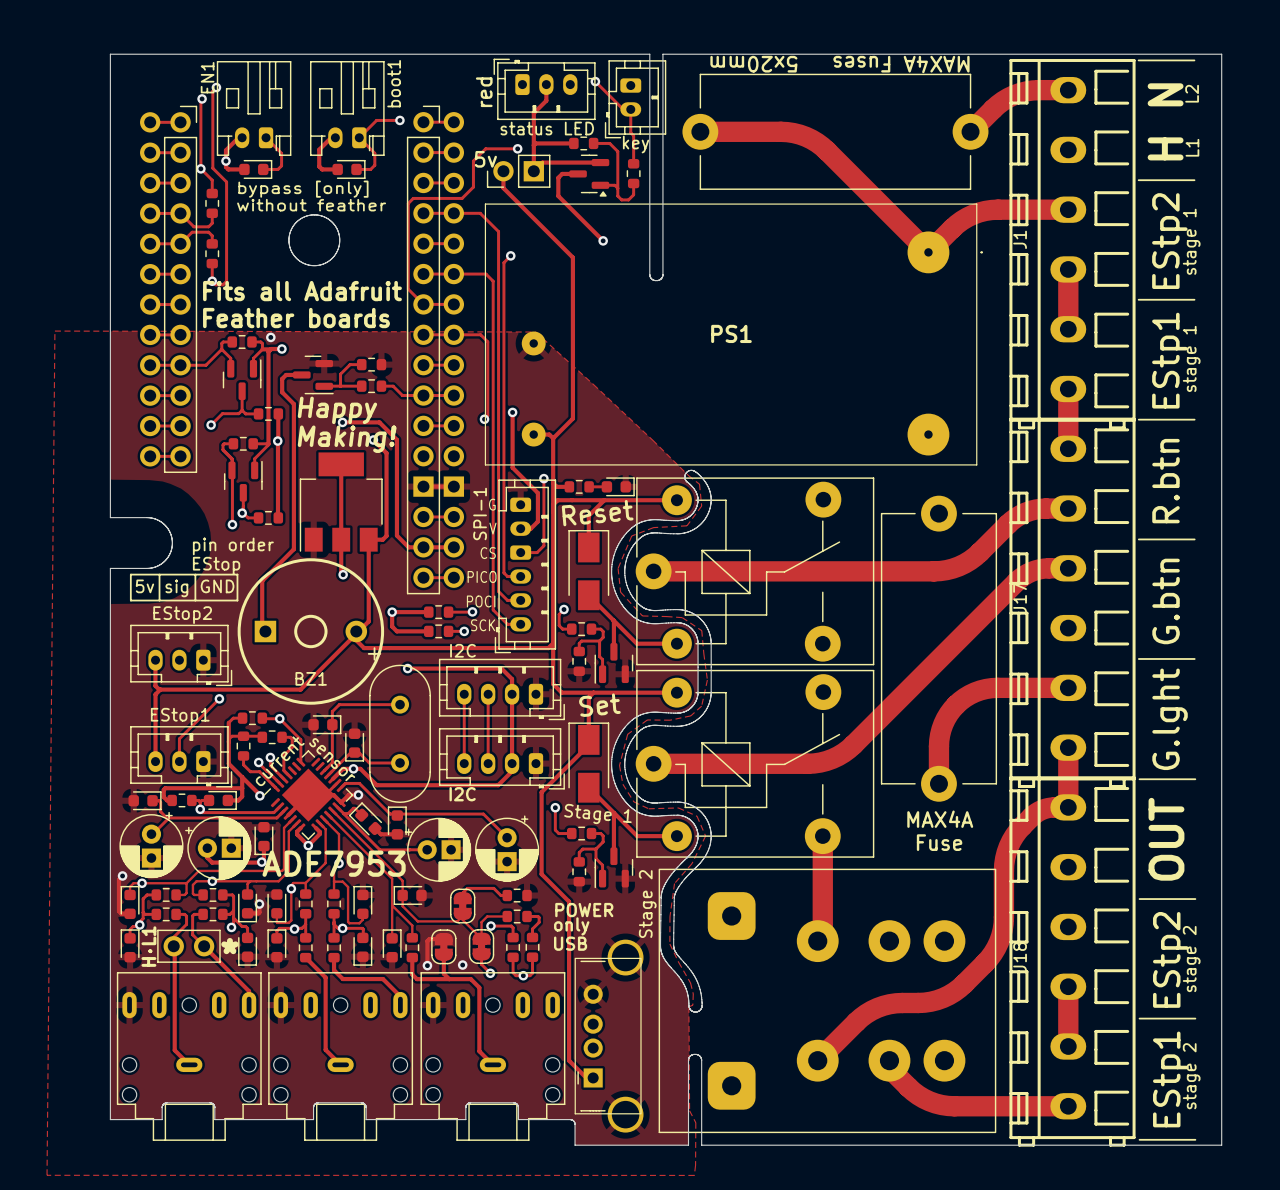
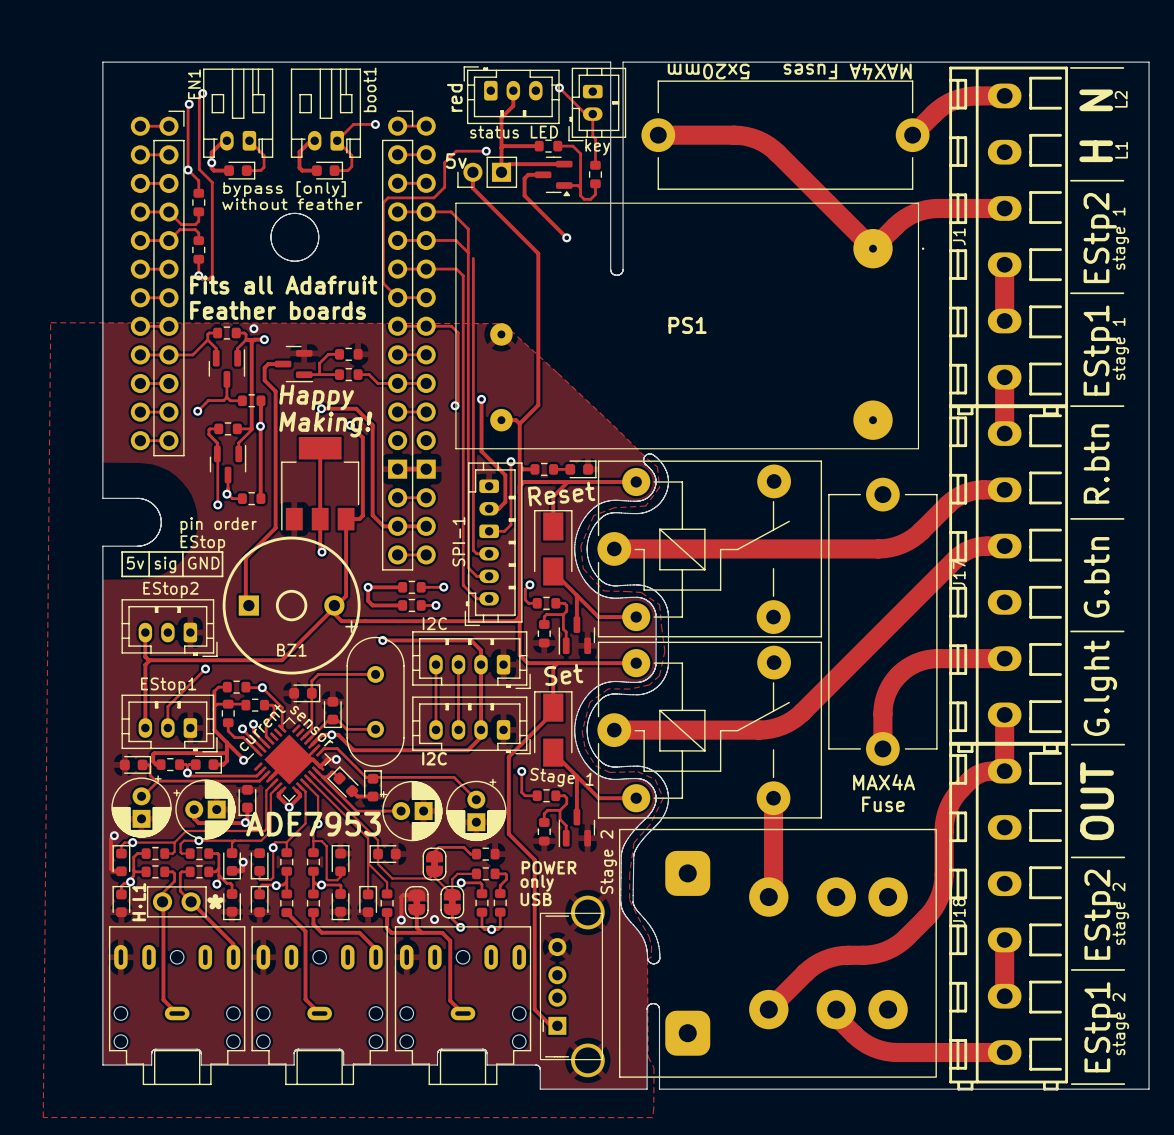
track: none -> (426, 240) (456, 240) (468, 252)
track: (510, 255) (503, 262) -> none
via: (510, 255) -> none
text: G (492, 504) -> none
SPI-1 name position: SPI-1 (480, 513) -> SPI-1 (458, 541)
text: V (492, 528) -> none
text: CS (488, 553) -> none
text: PICO (482, 576) -> none
text: POCI (481, 601) -> none
text: SCK (483, 625) -> none

